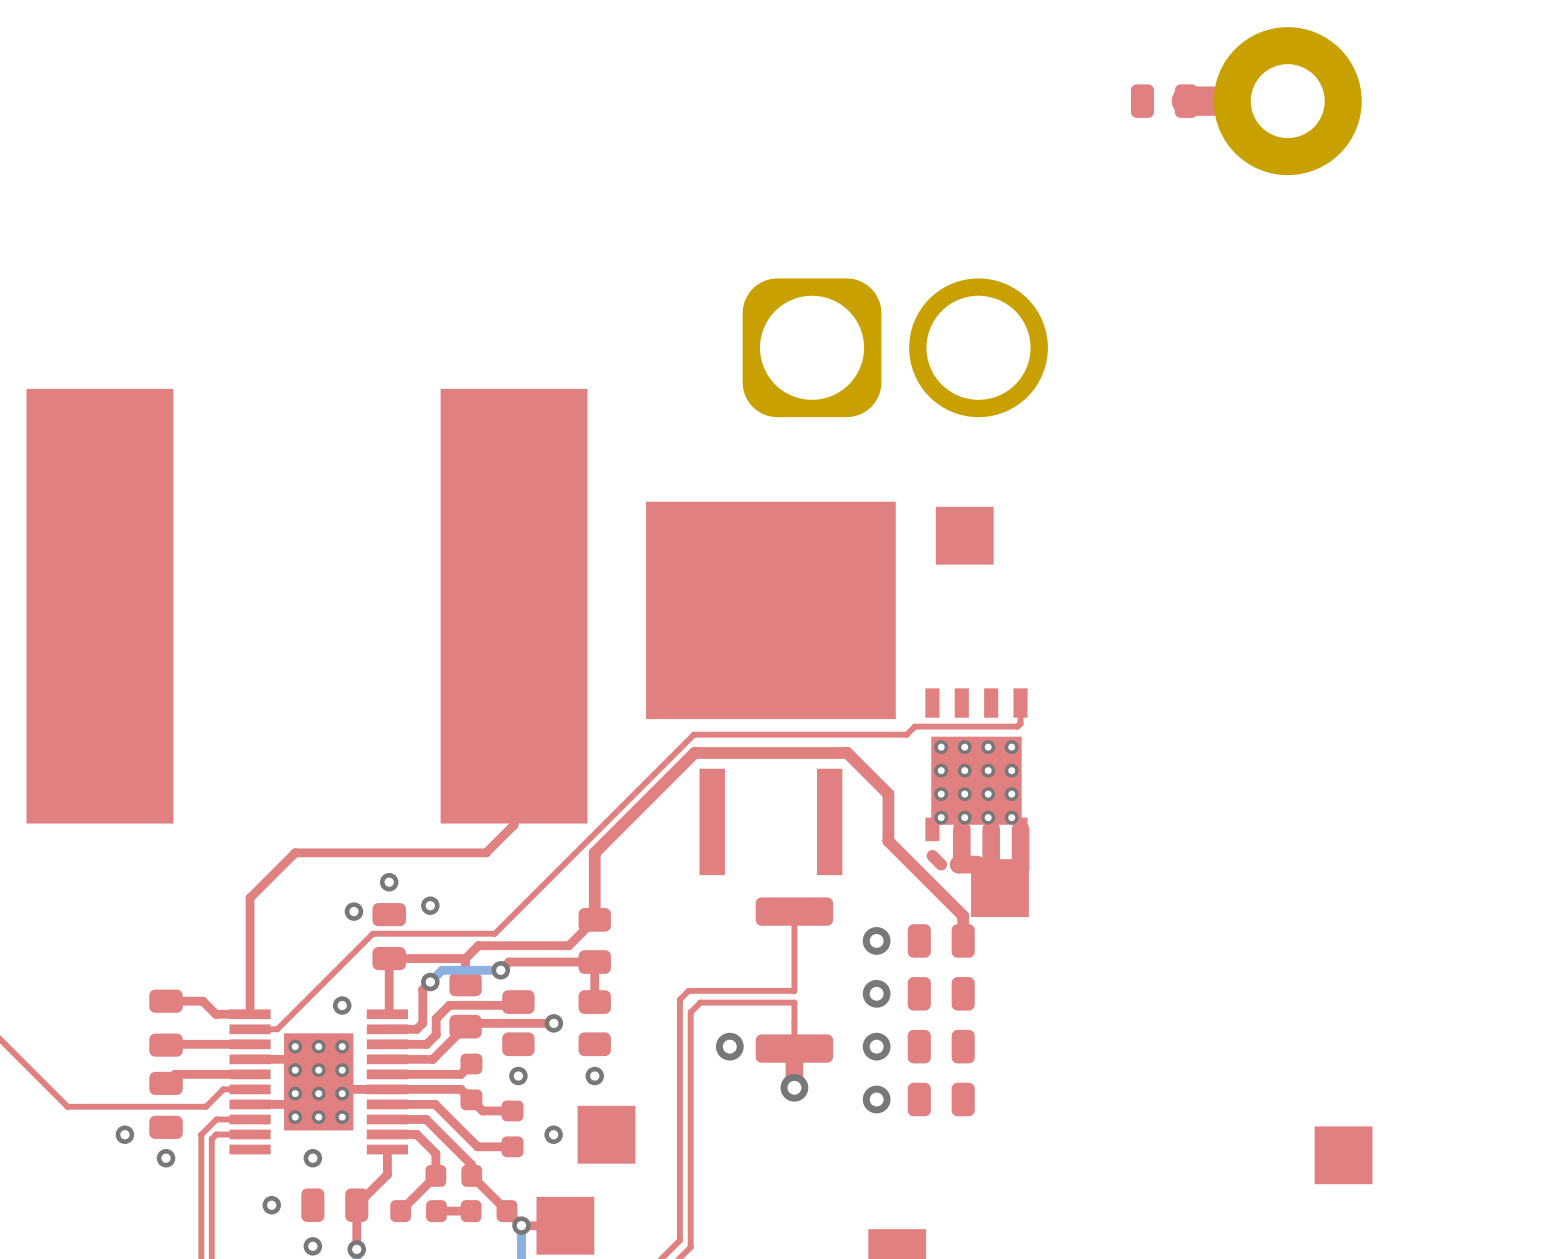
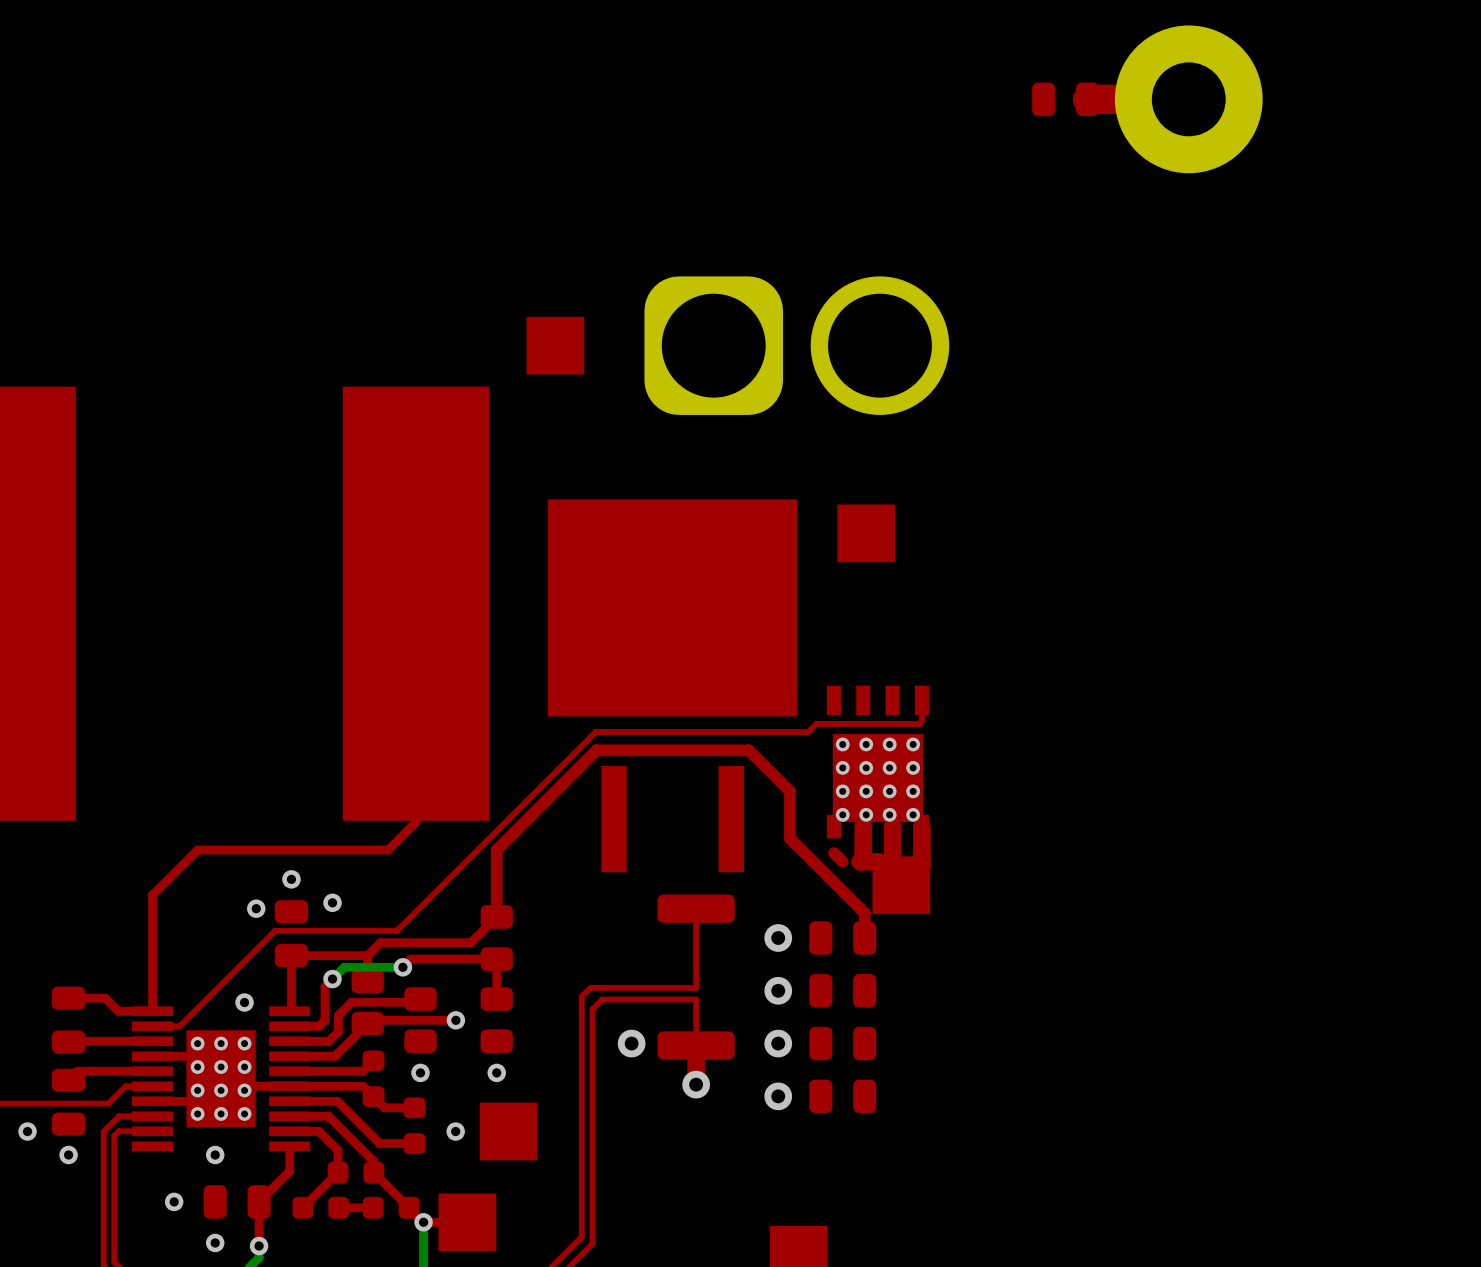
part: none -> (555, 345)
part: (1343, 1155) -> none

